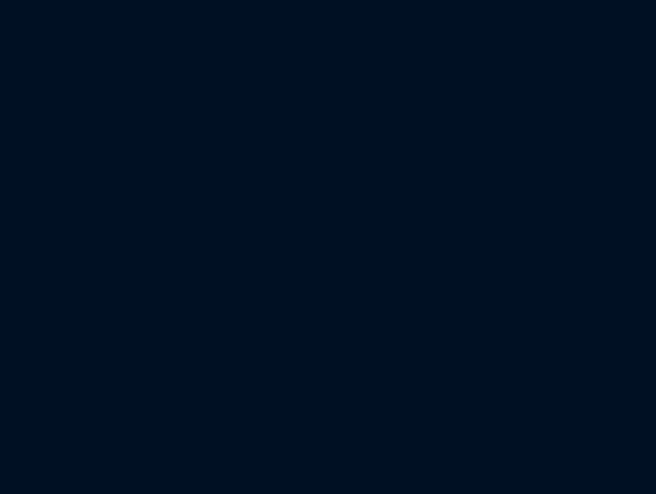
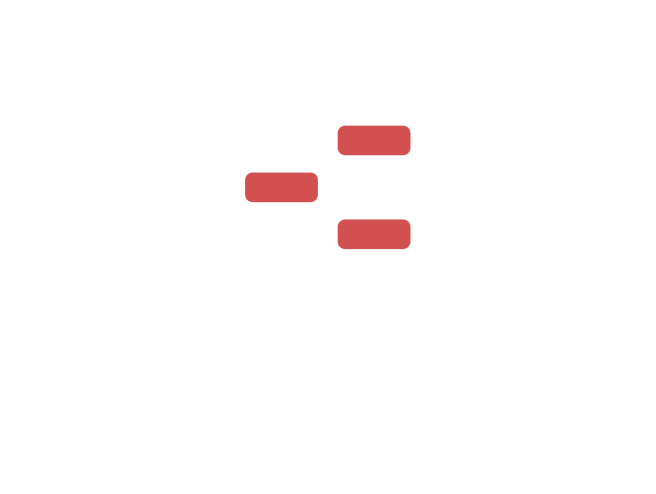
part: none -> (327, 187)

